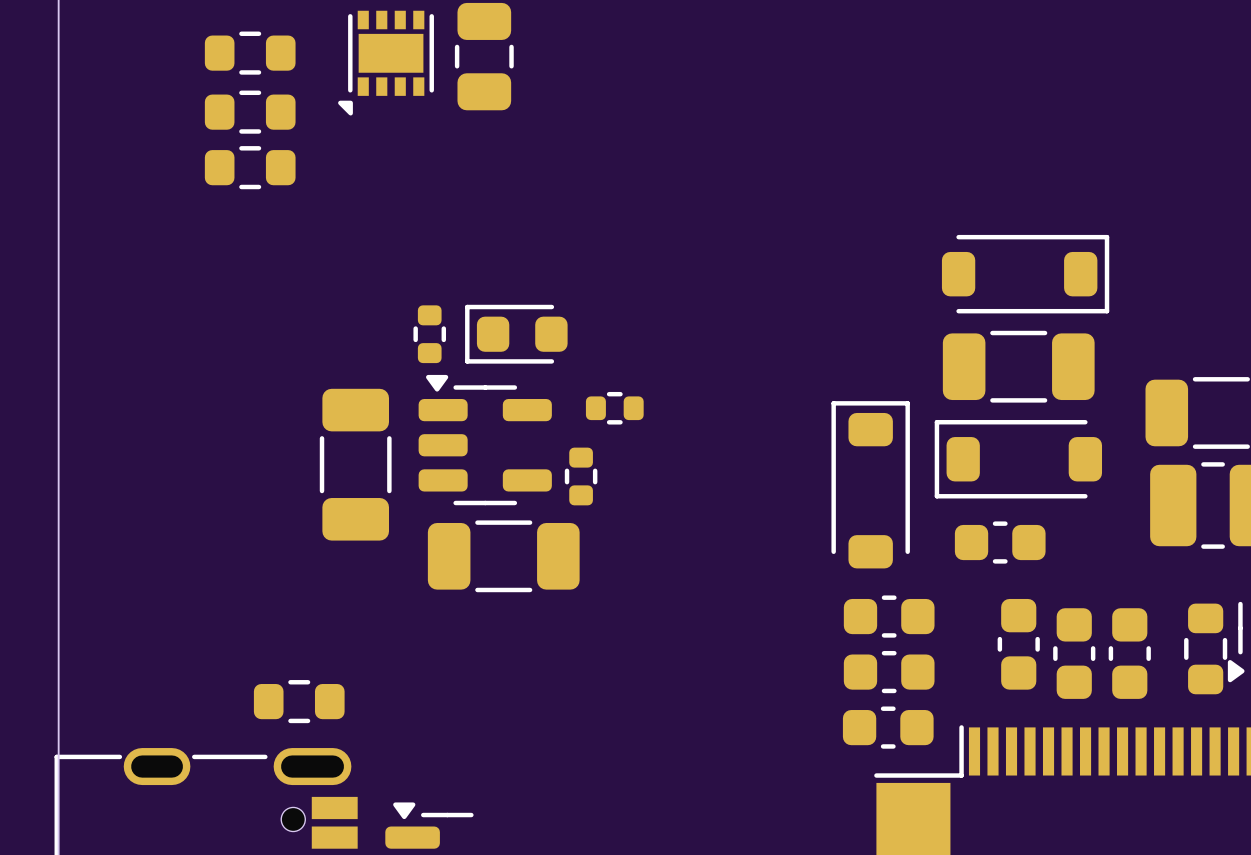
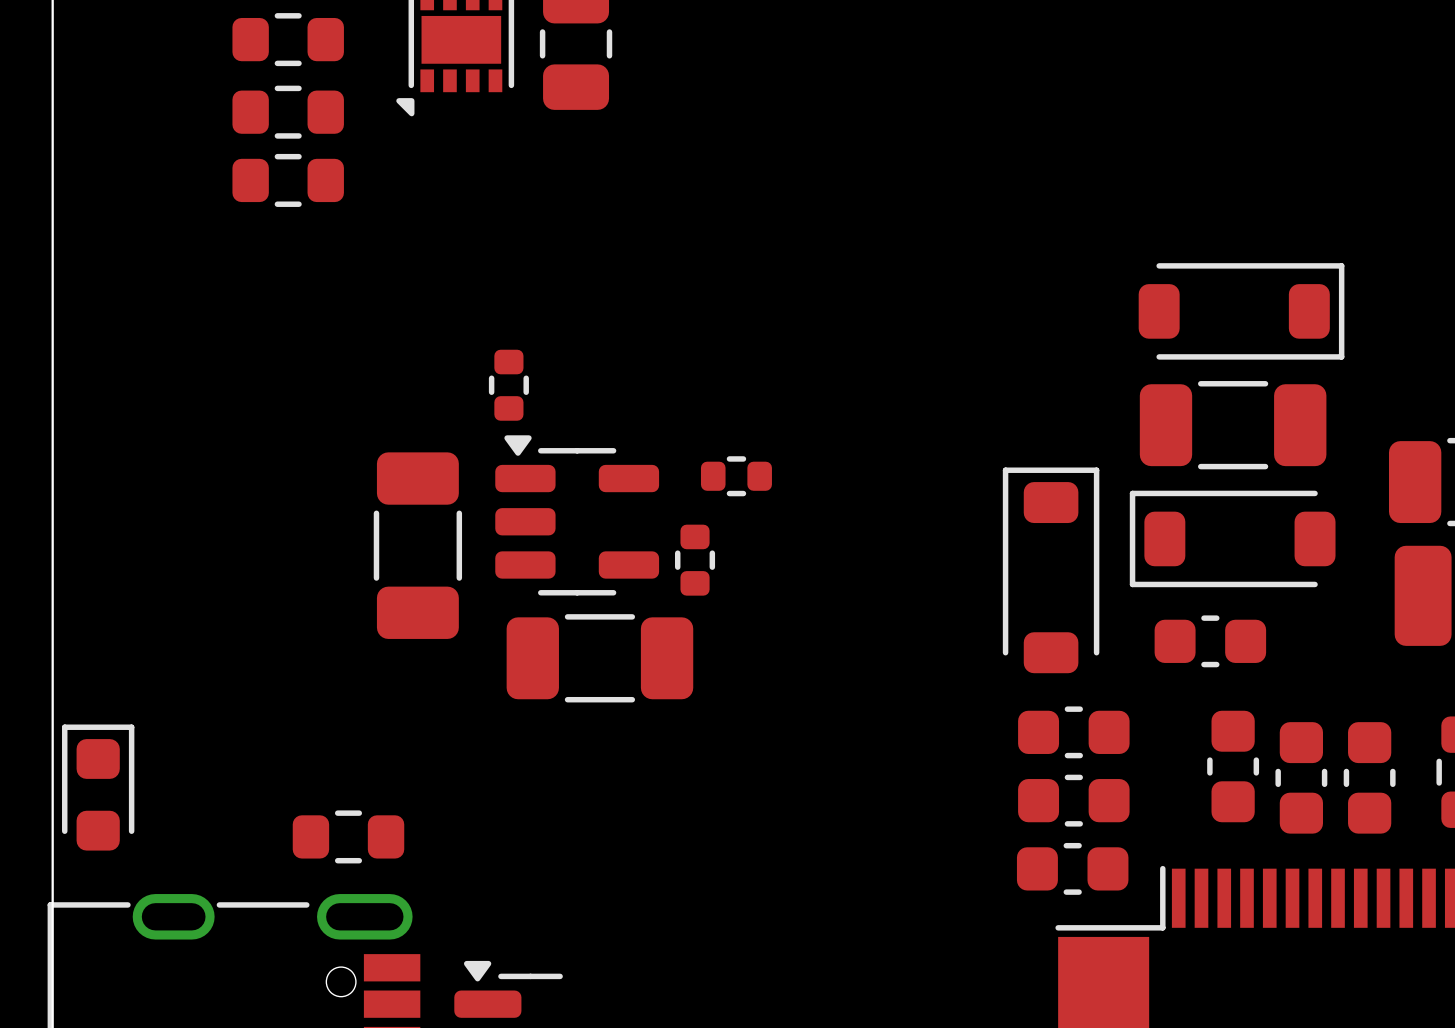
part rotation: 0° (516, 334) -> 90° clockwise (98, 787)
part position: (516, 334) -> (98, 787)

